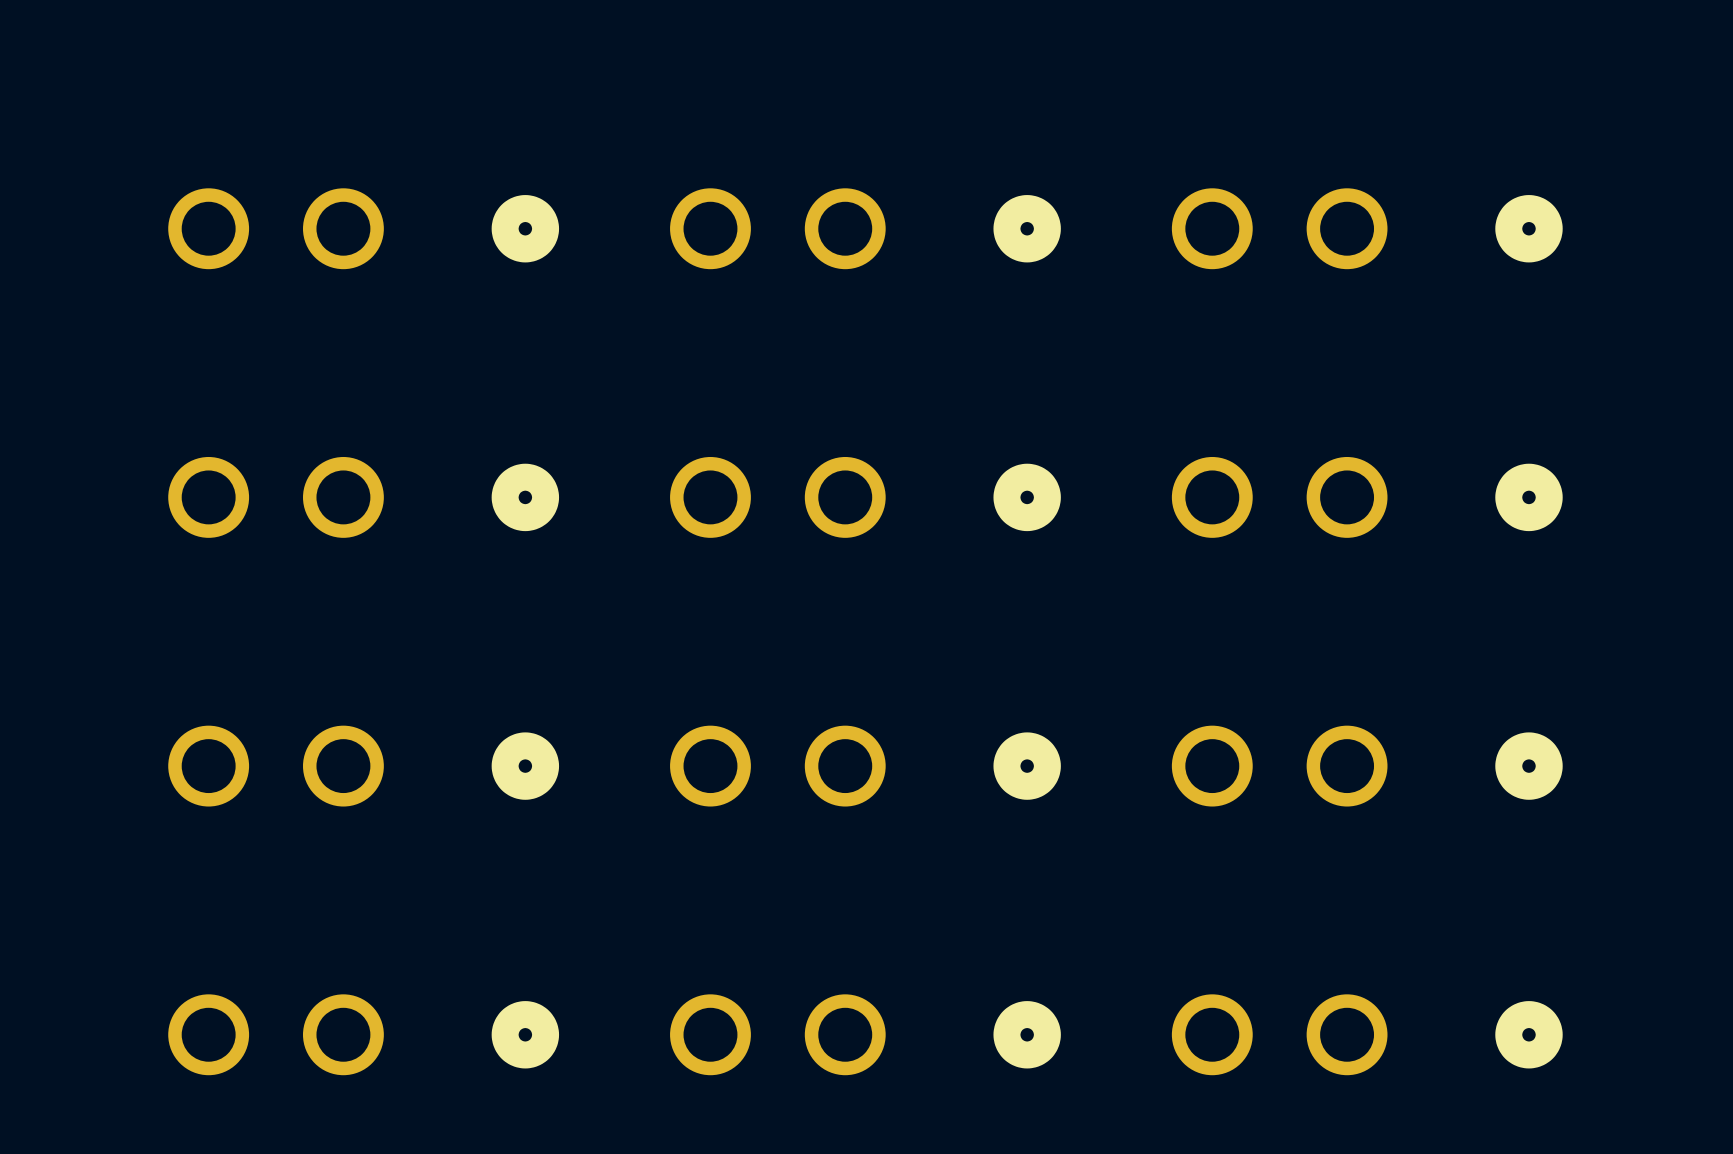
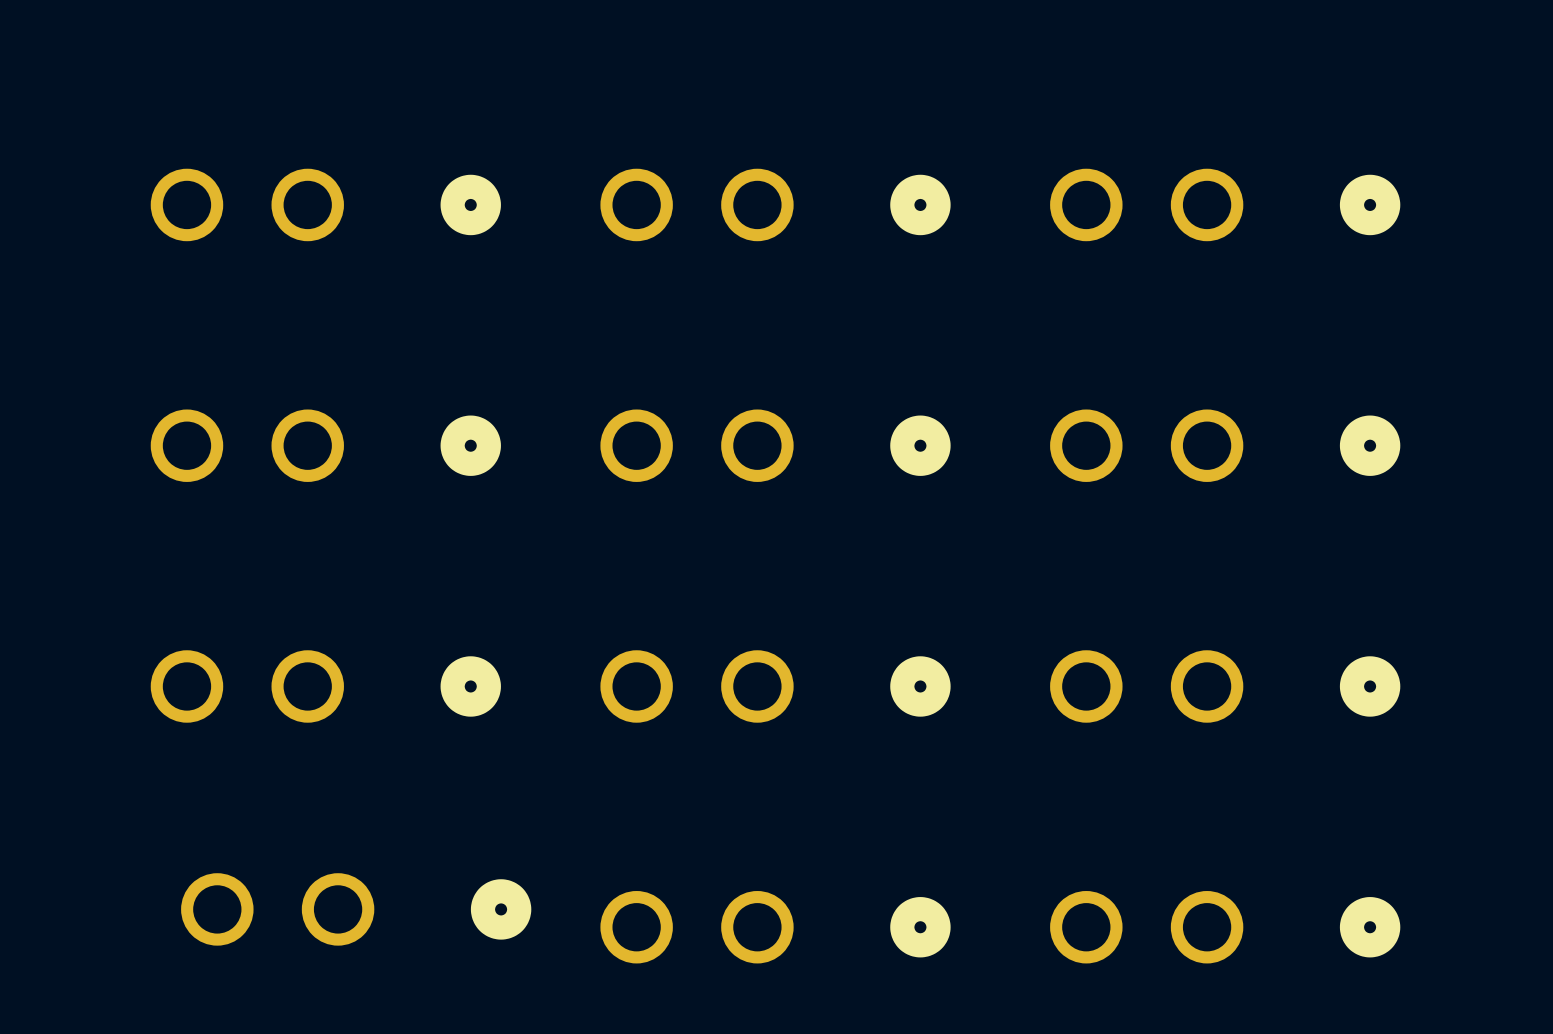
part position: (363, 1034) -> (356, 909)

